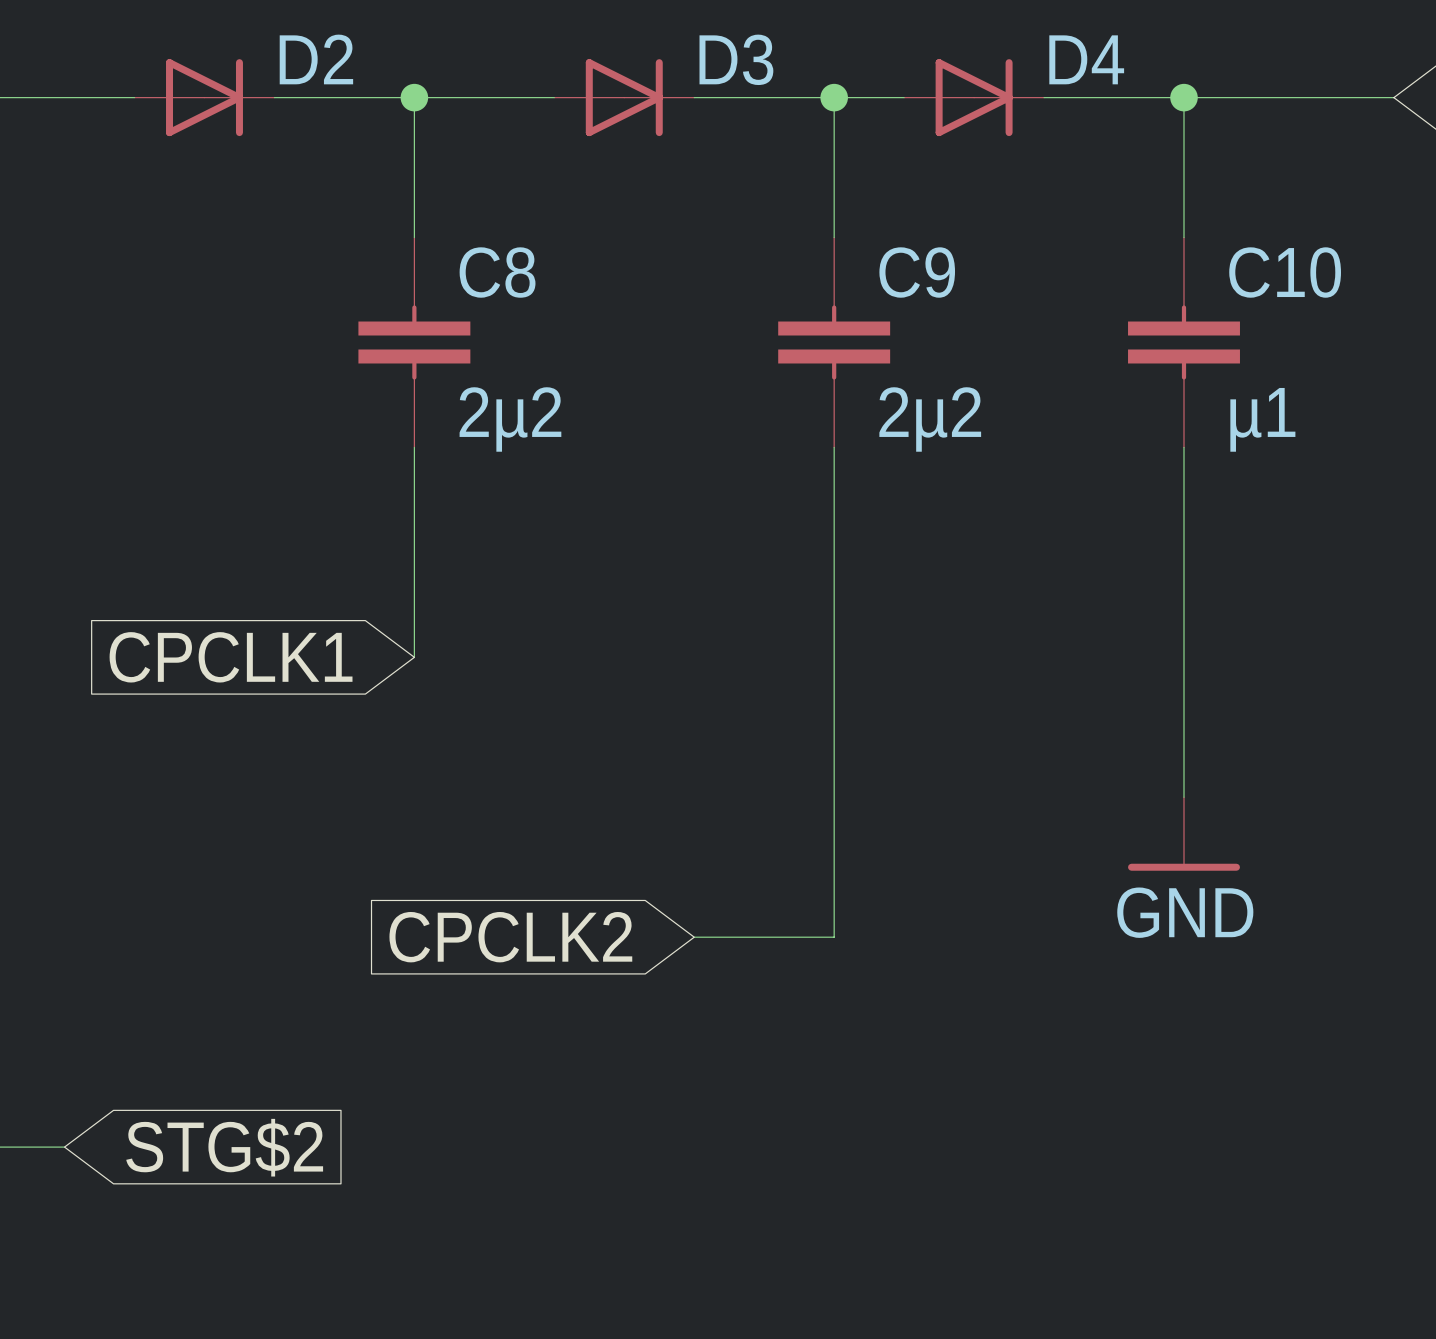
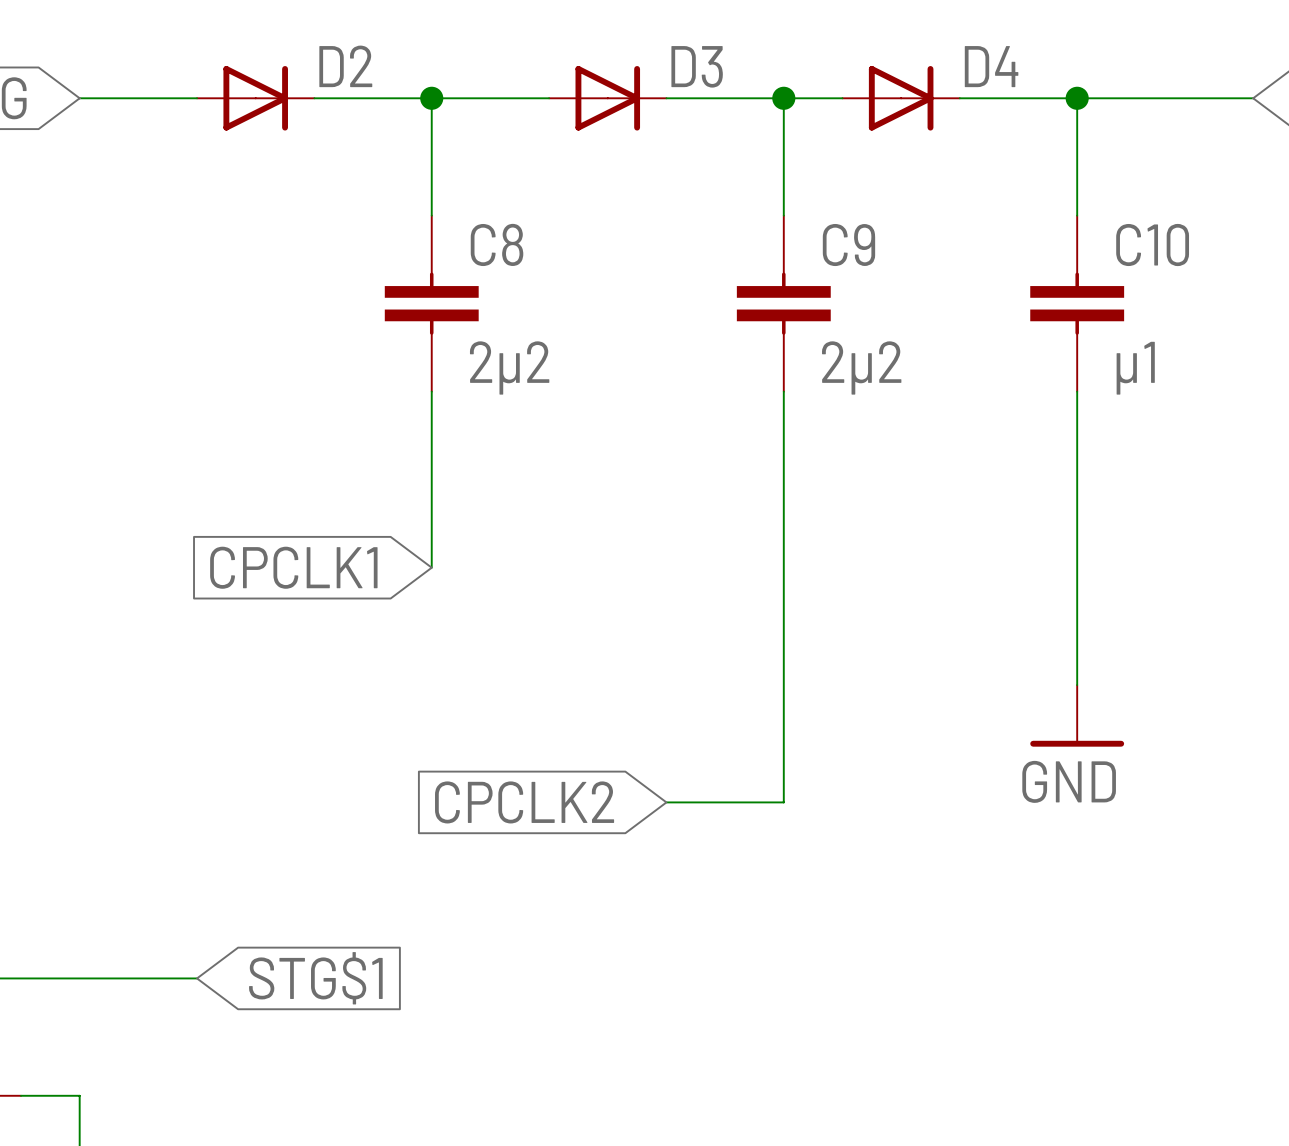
wire: none -> (138, 978) (197, 978)
global label: STG$2 (224, 1147) -> STG$1 (315, 978)

